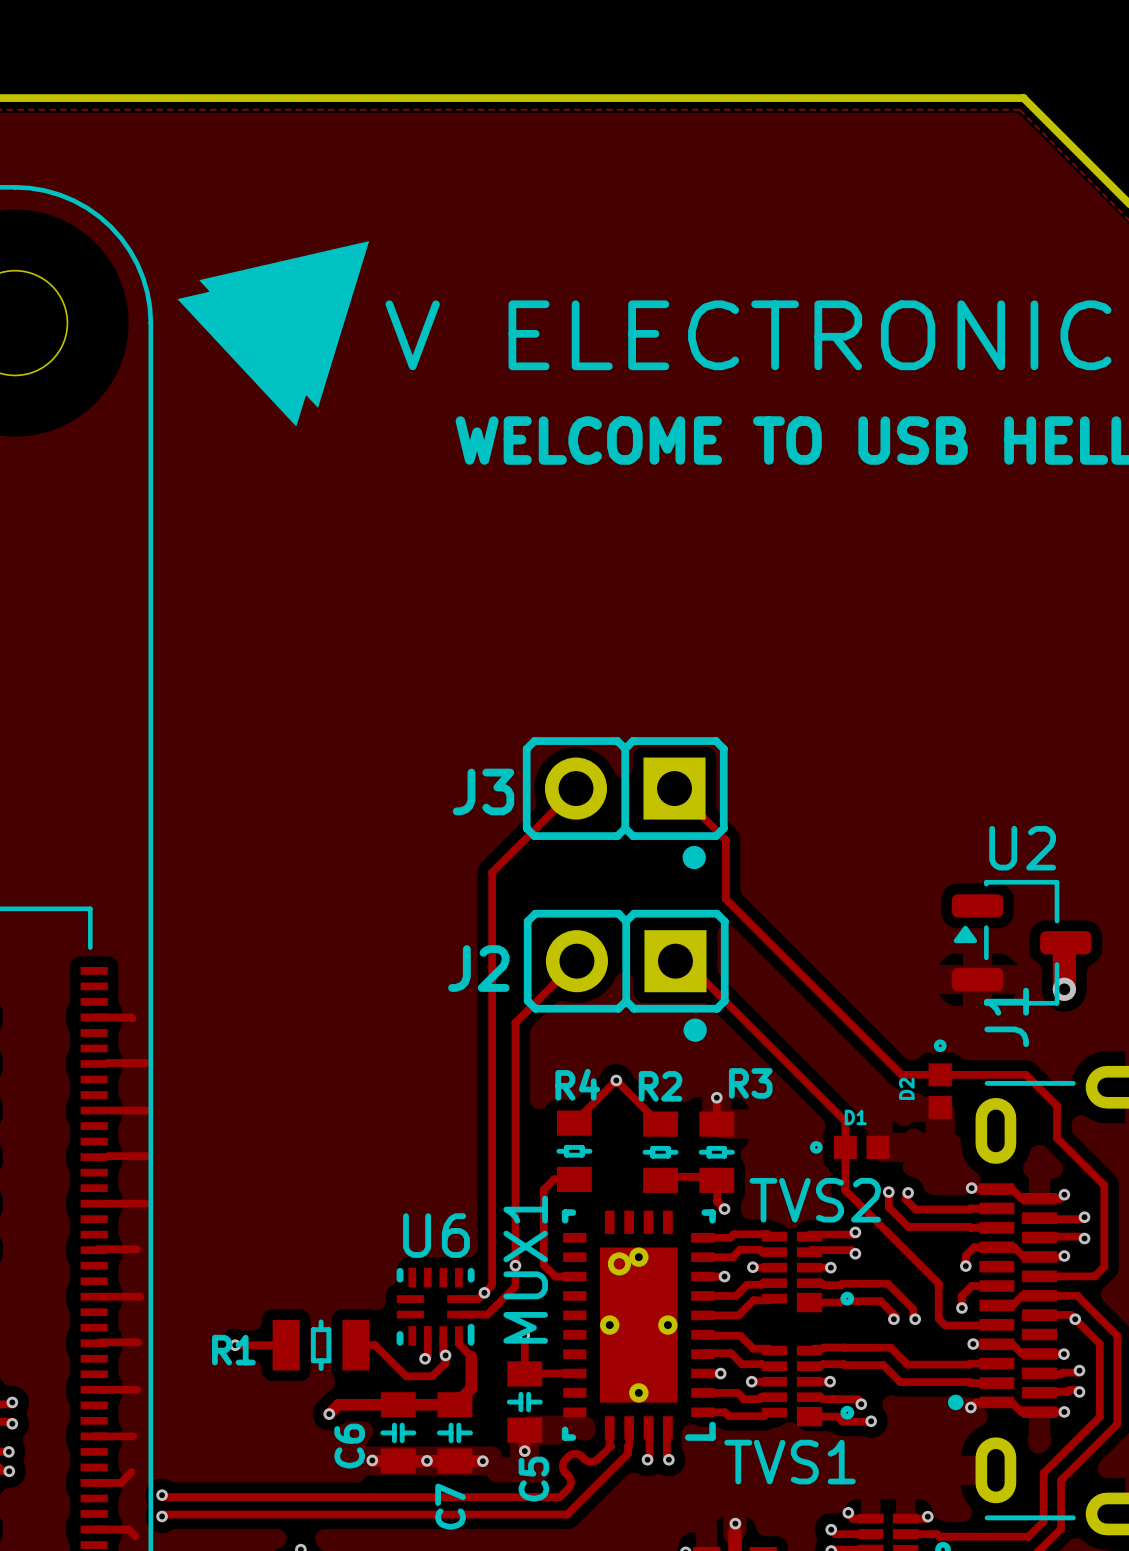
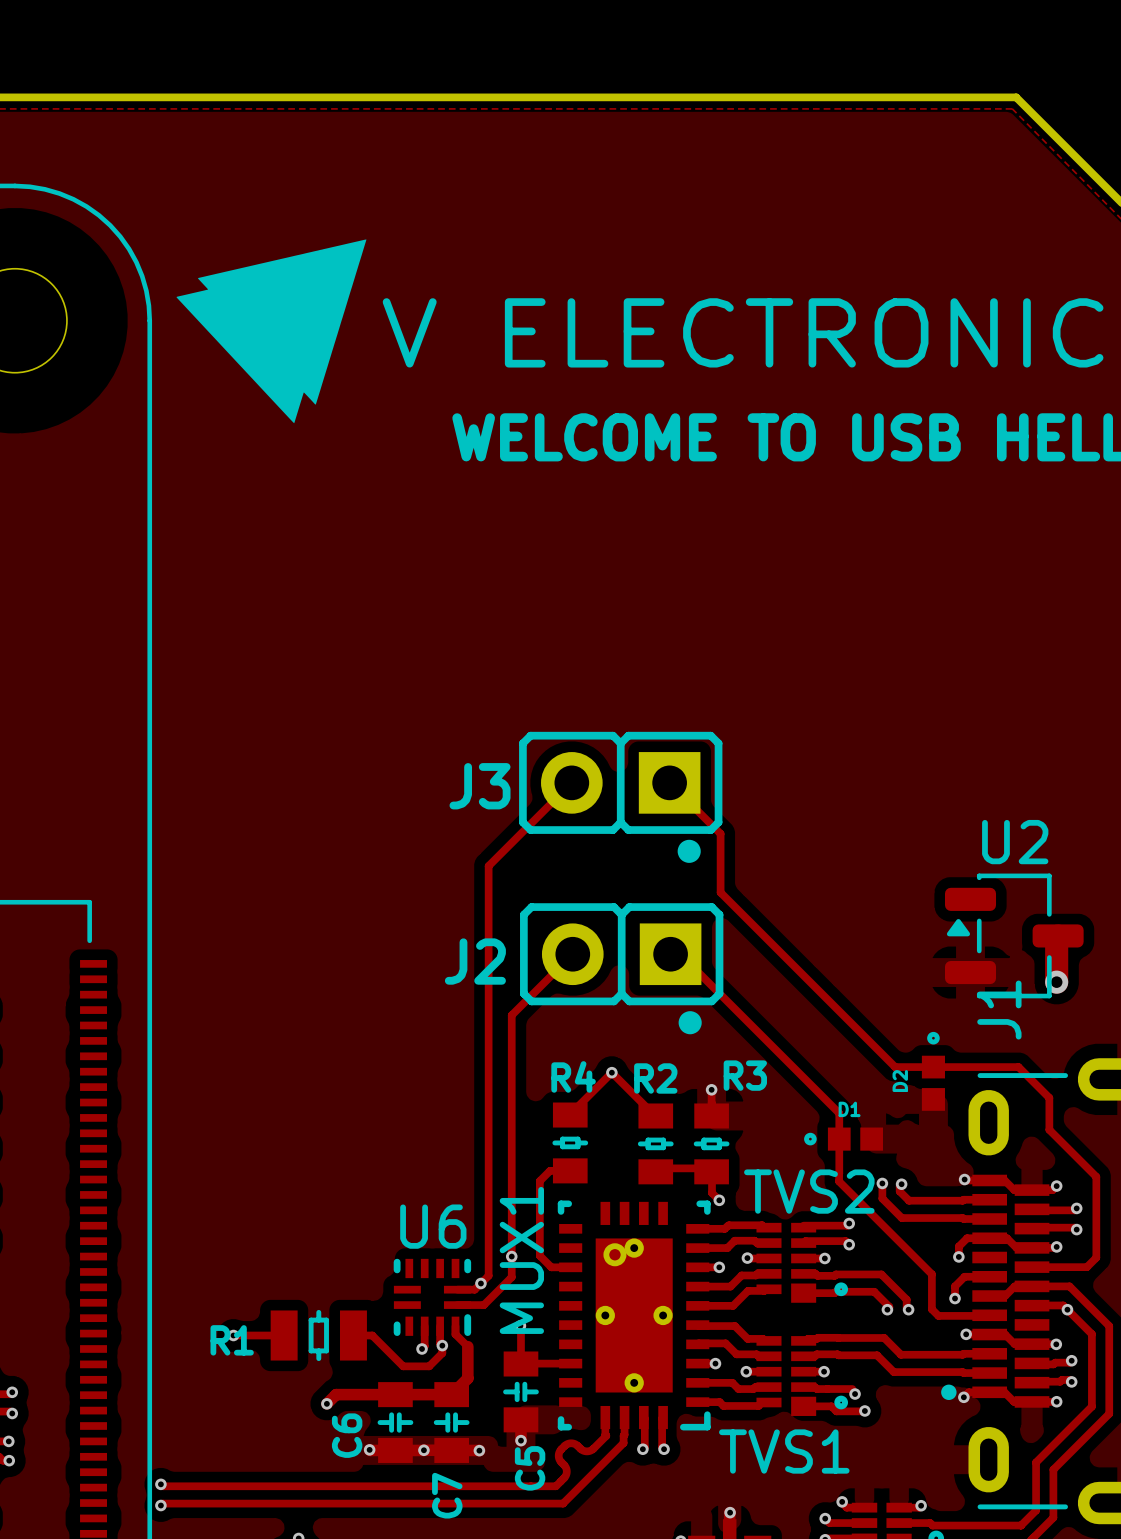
track: (94, 1017) (132, 1018) -> none
track: (106, 1063) (146, 1063) -> none
track: (109, 1110) (149, 1110) -> none
track: (107, 1156) (147, 1156) -> none
track: (106, 1203) (146, 1203) -> none
track: (98, 1249) (137, 1249) -> none
track: (100, 1296) (140, 1296) -> none
track: (99, 1342) (138, 1342) -> none
track: (98, 1389) (137, 1389) -> none
track: (94, 1436) (133, 1436) -> none
track: (131, 1472) (120, 1482) (94, 1482) -> none
track: (94, 1529) (128, 1529) (135, 1536) -> none

